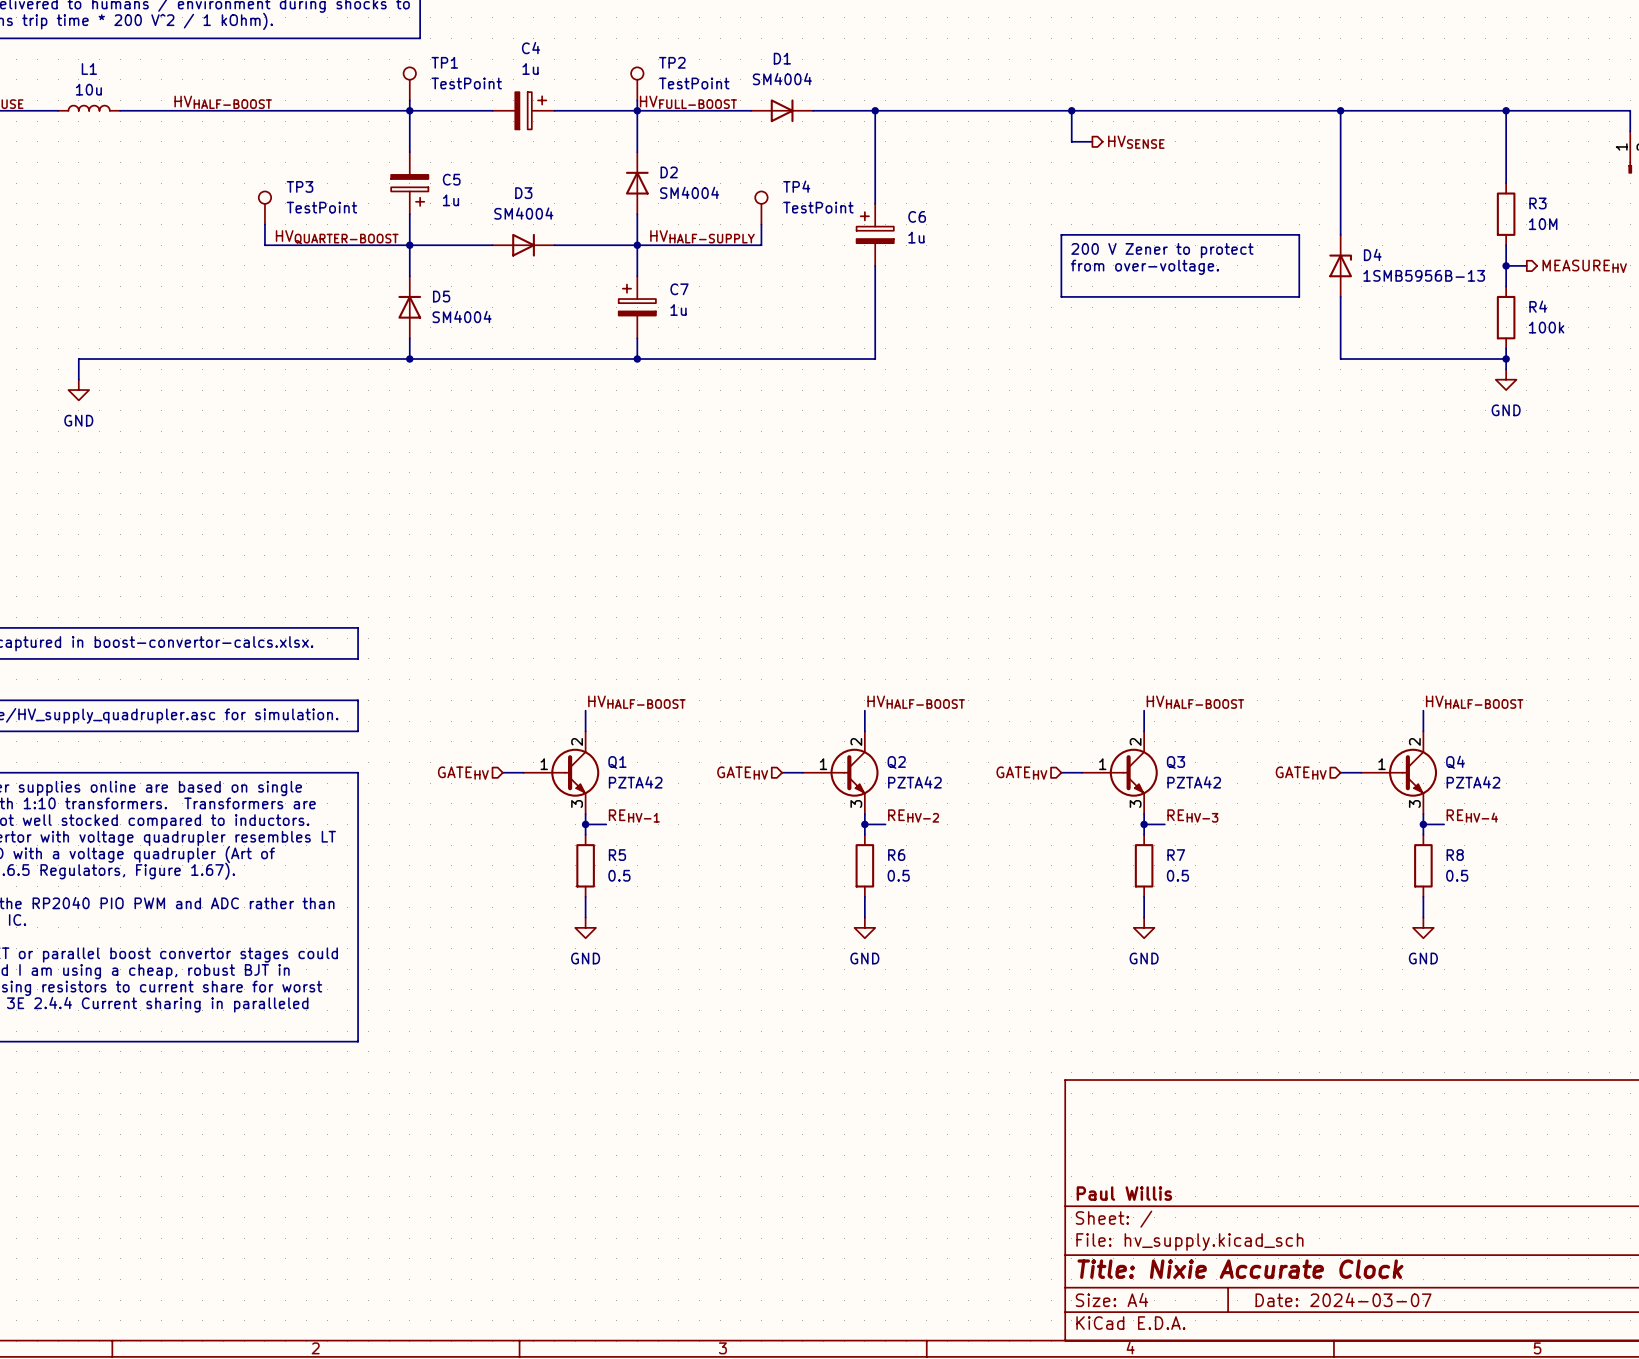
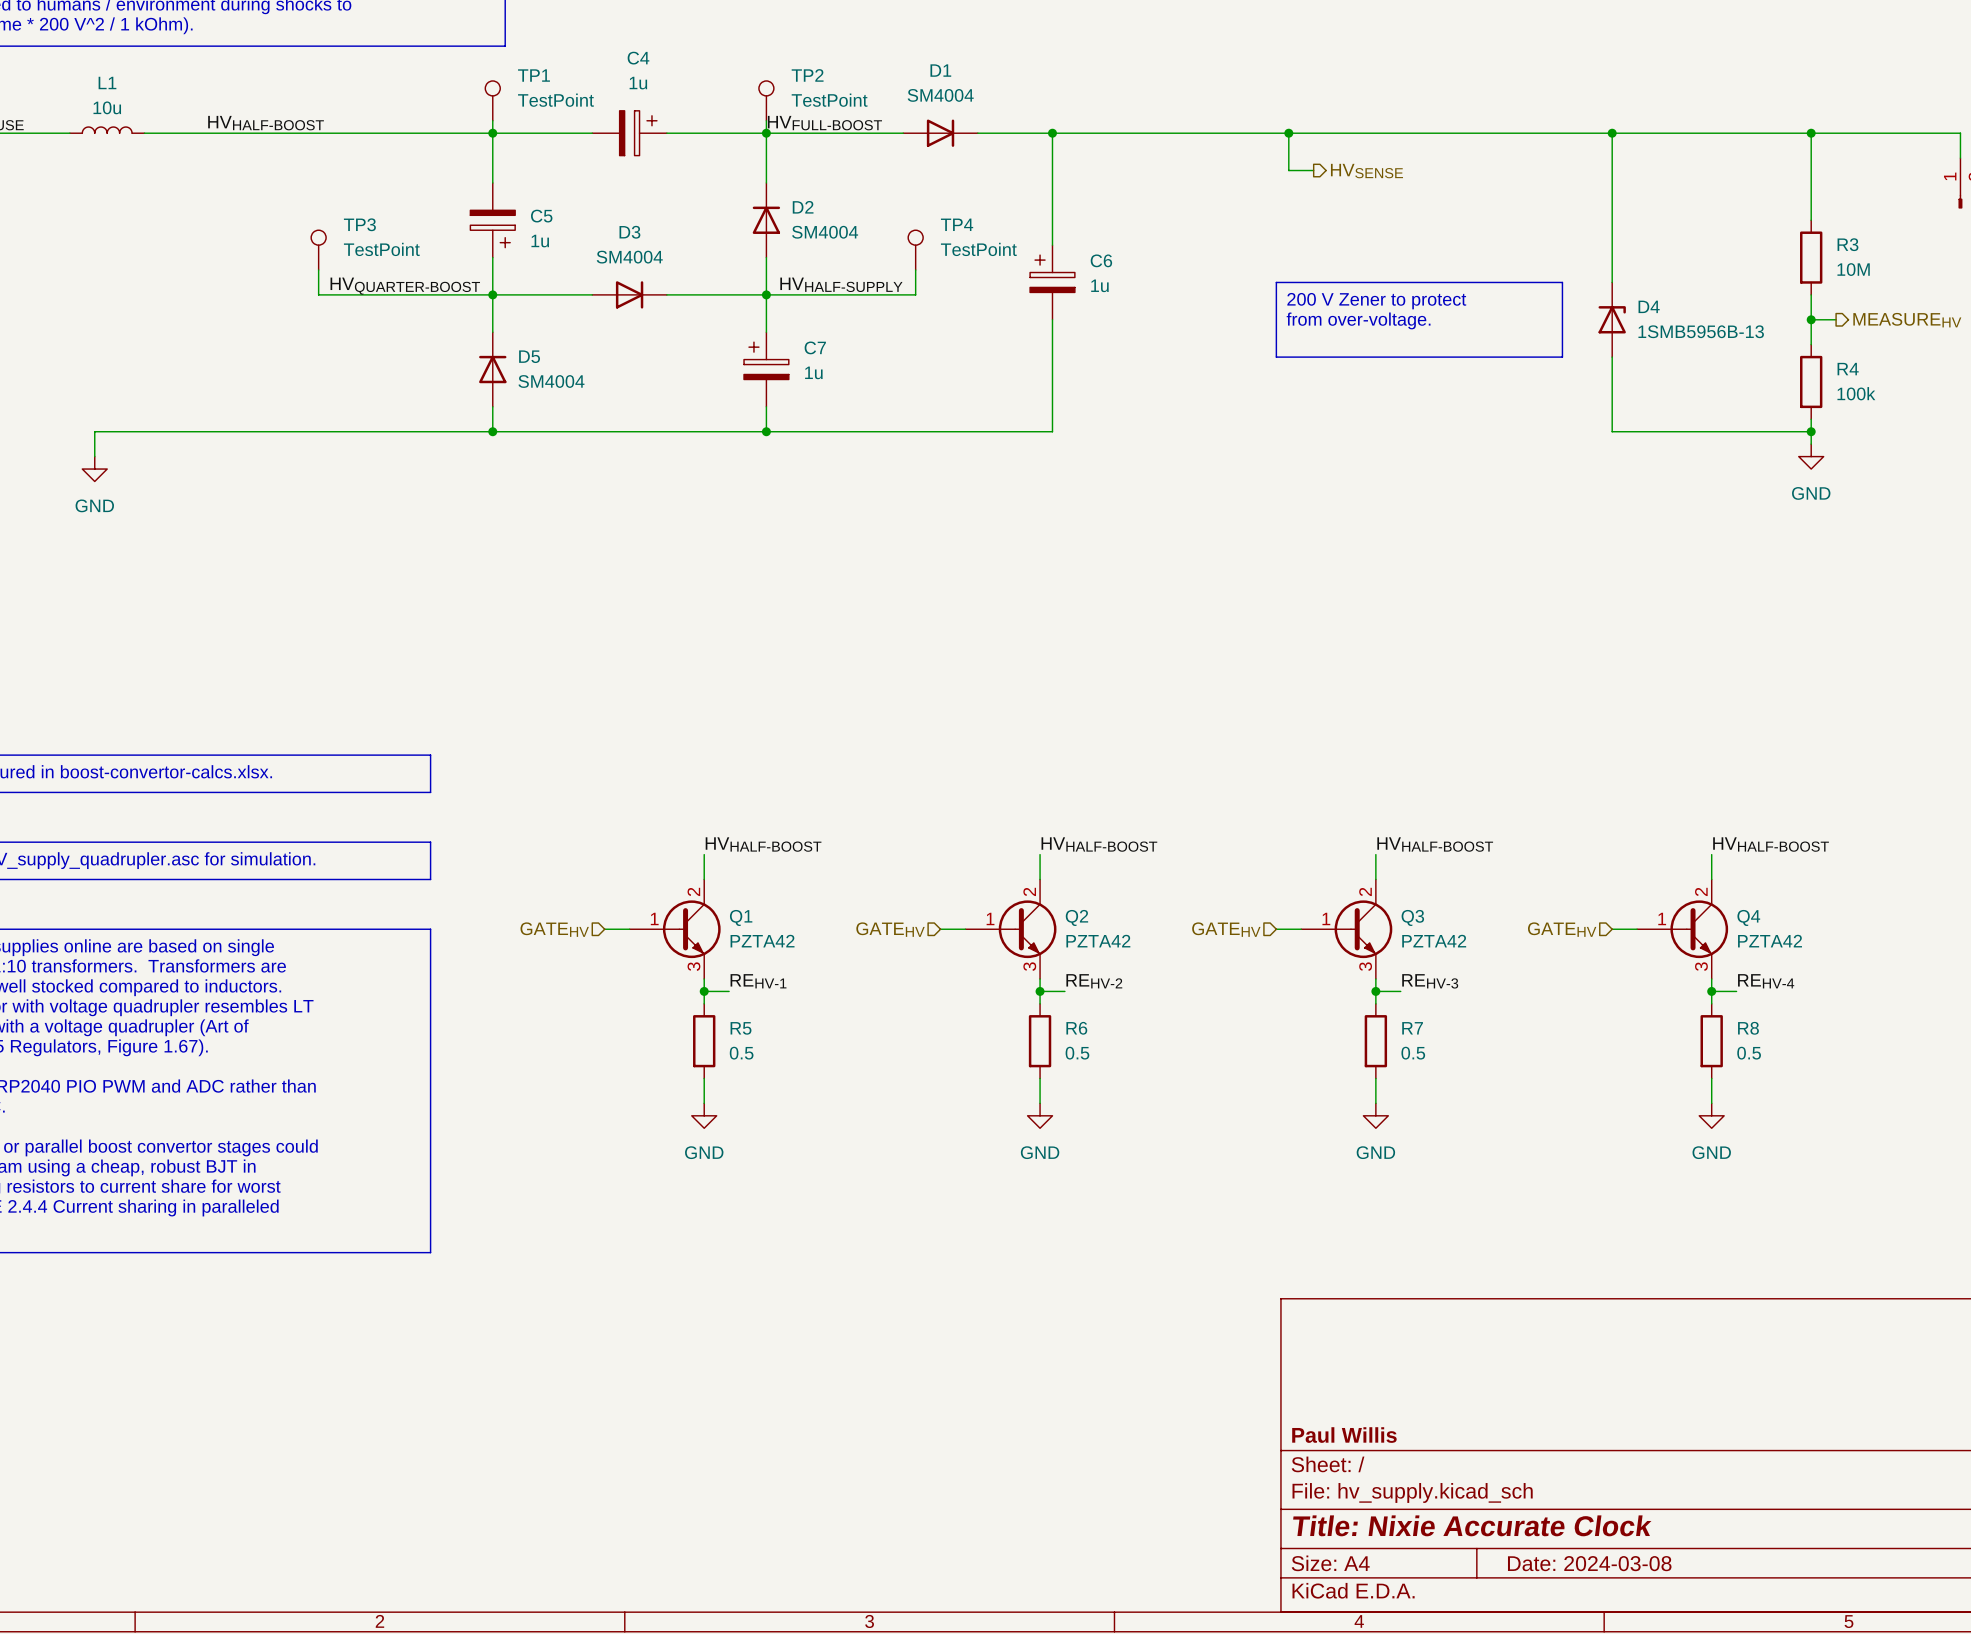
title block: Date: 2024-03-07 (1343, 1299) -> Date: 2024-03-08 (1589, 1563)

